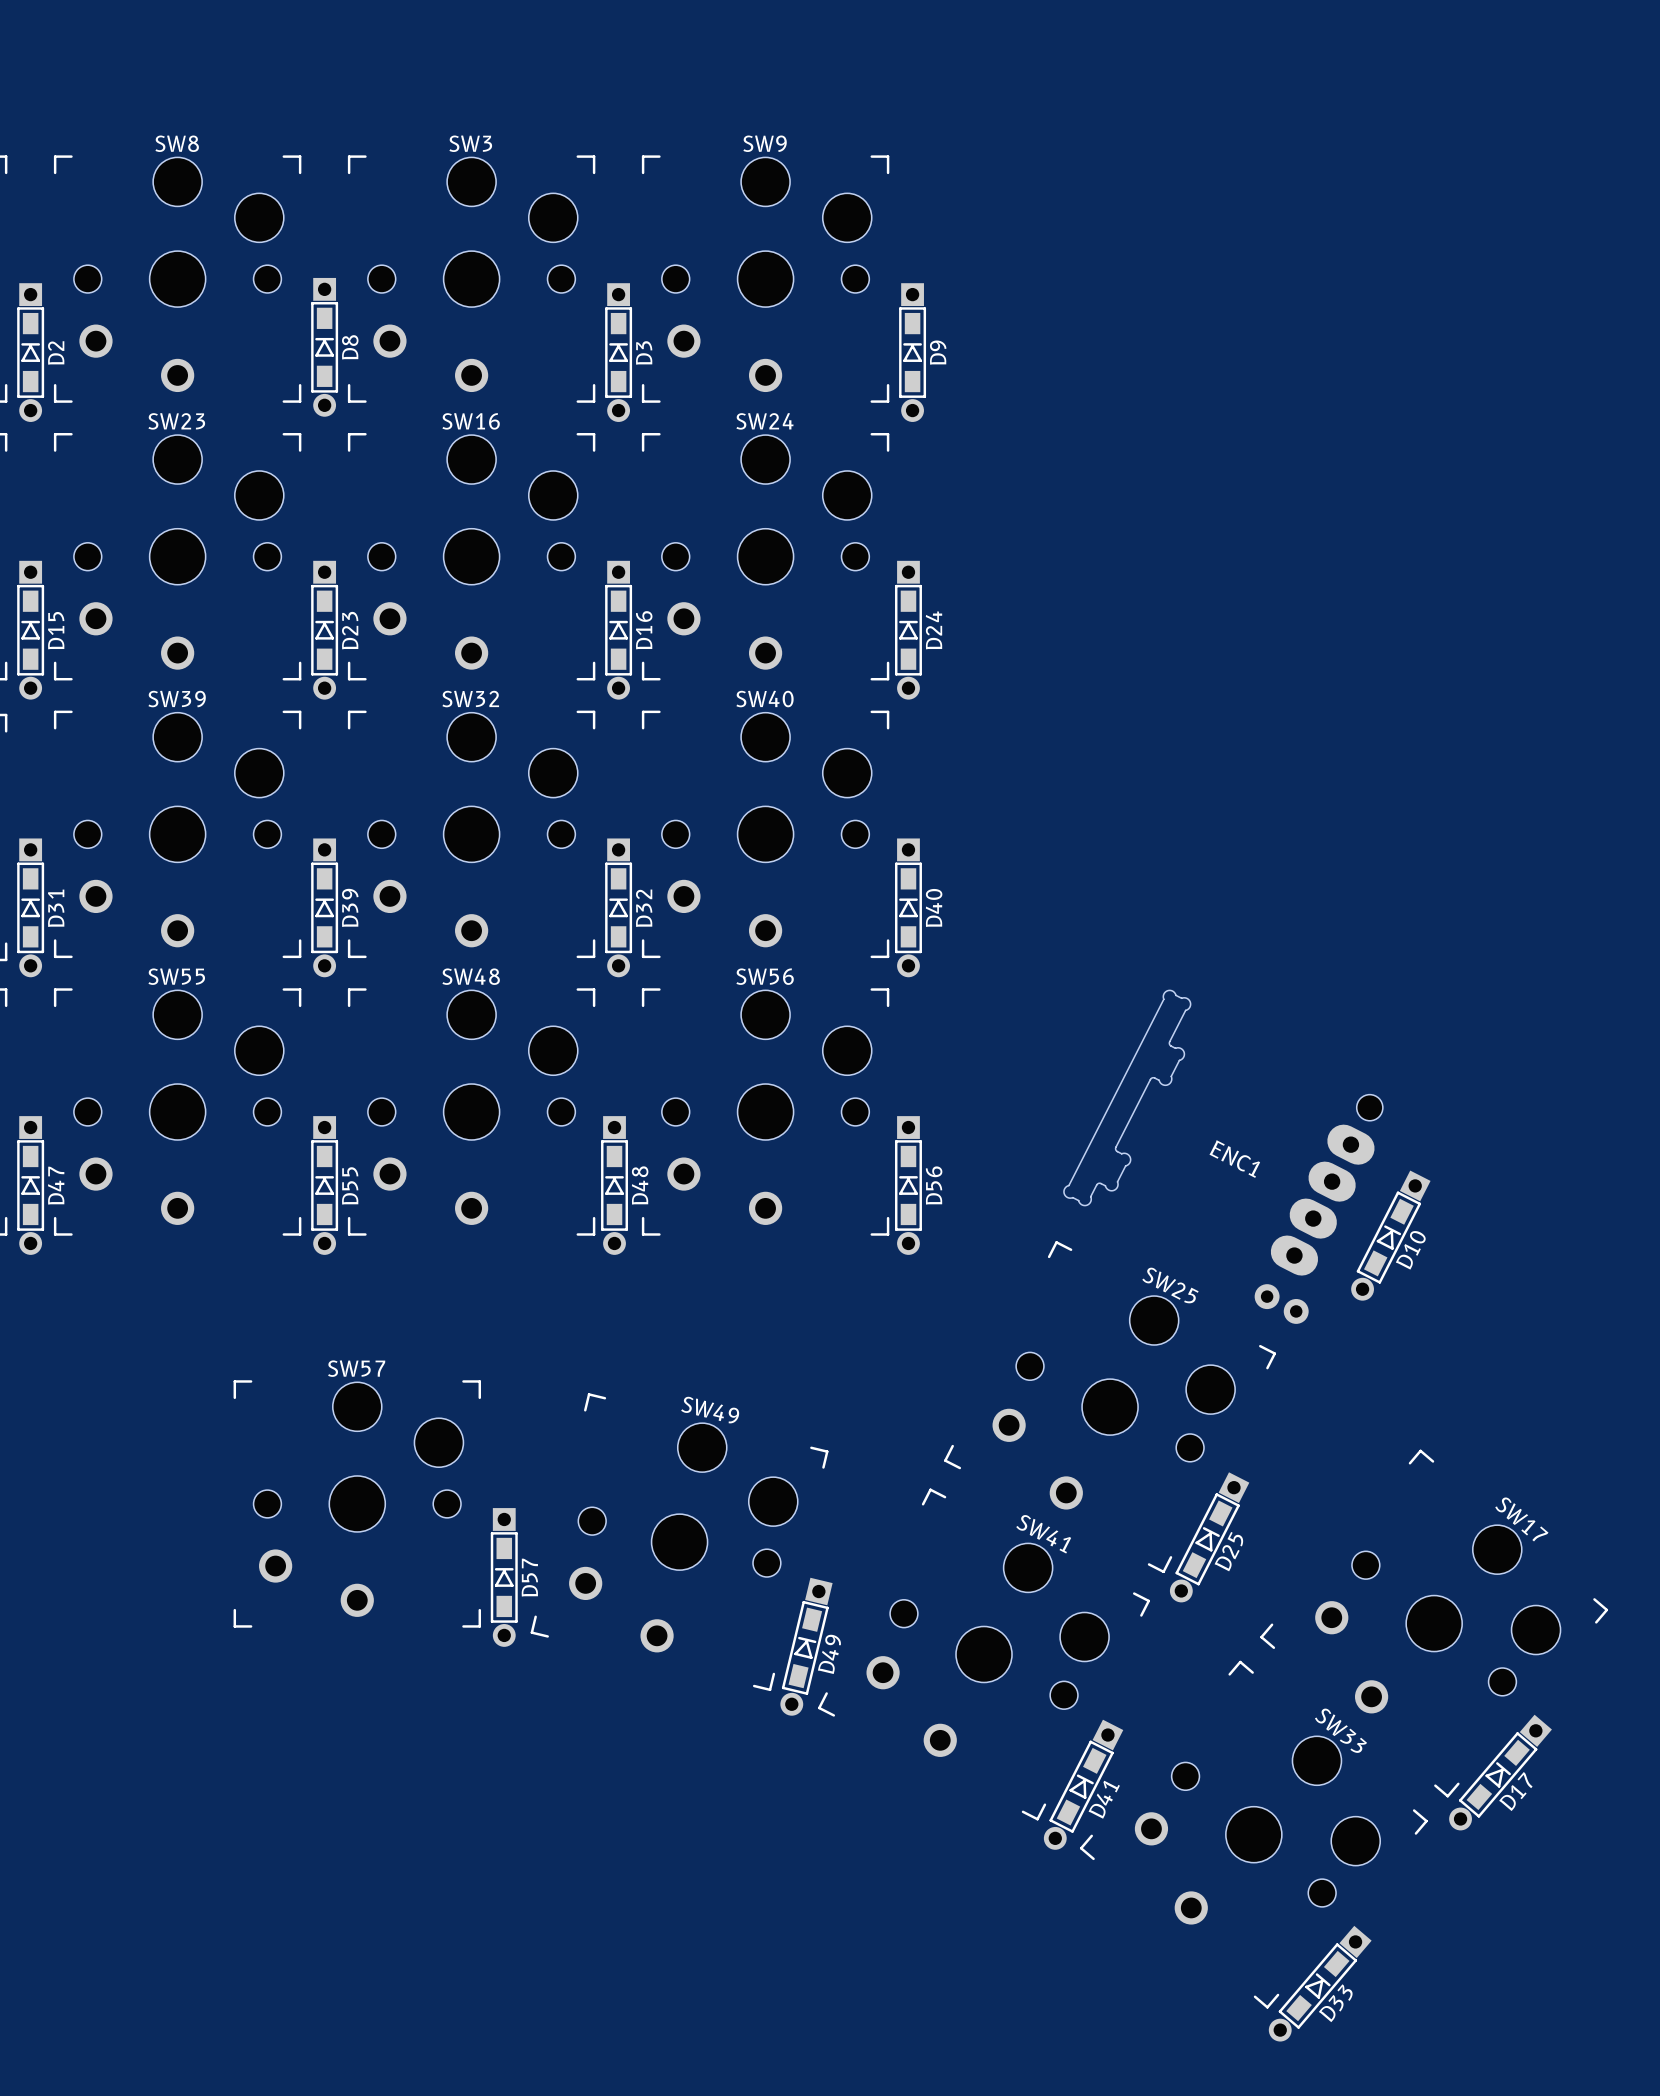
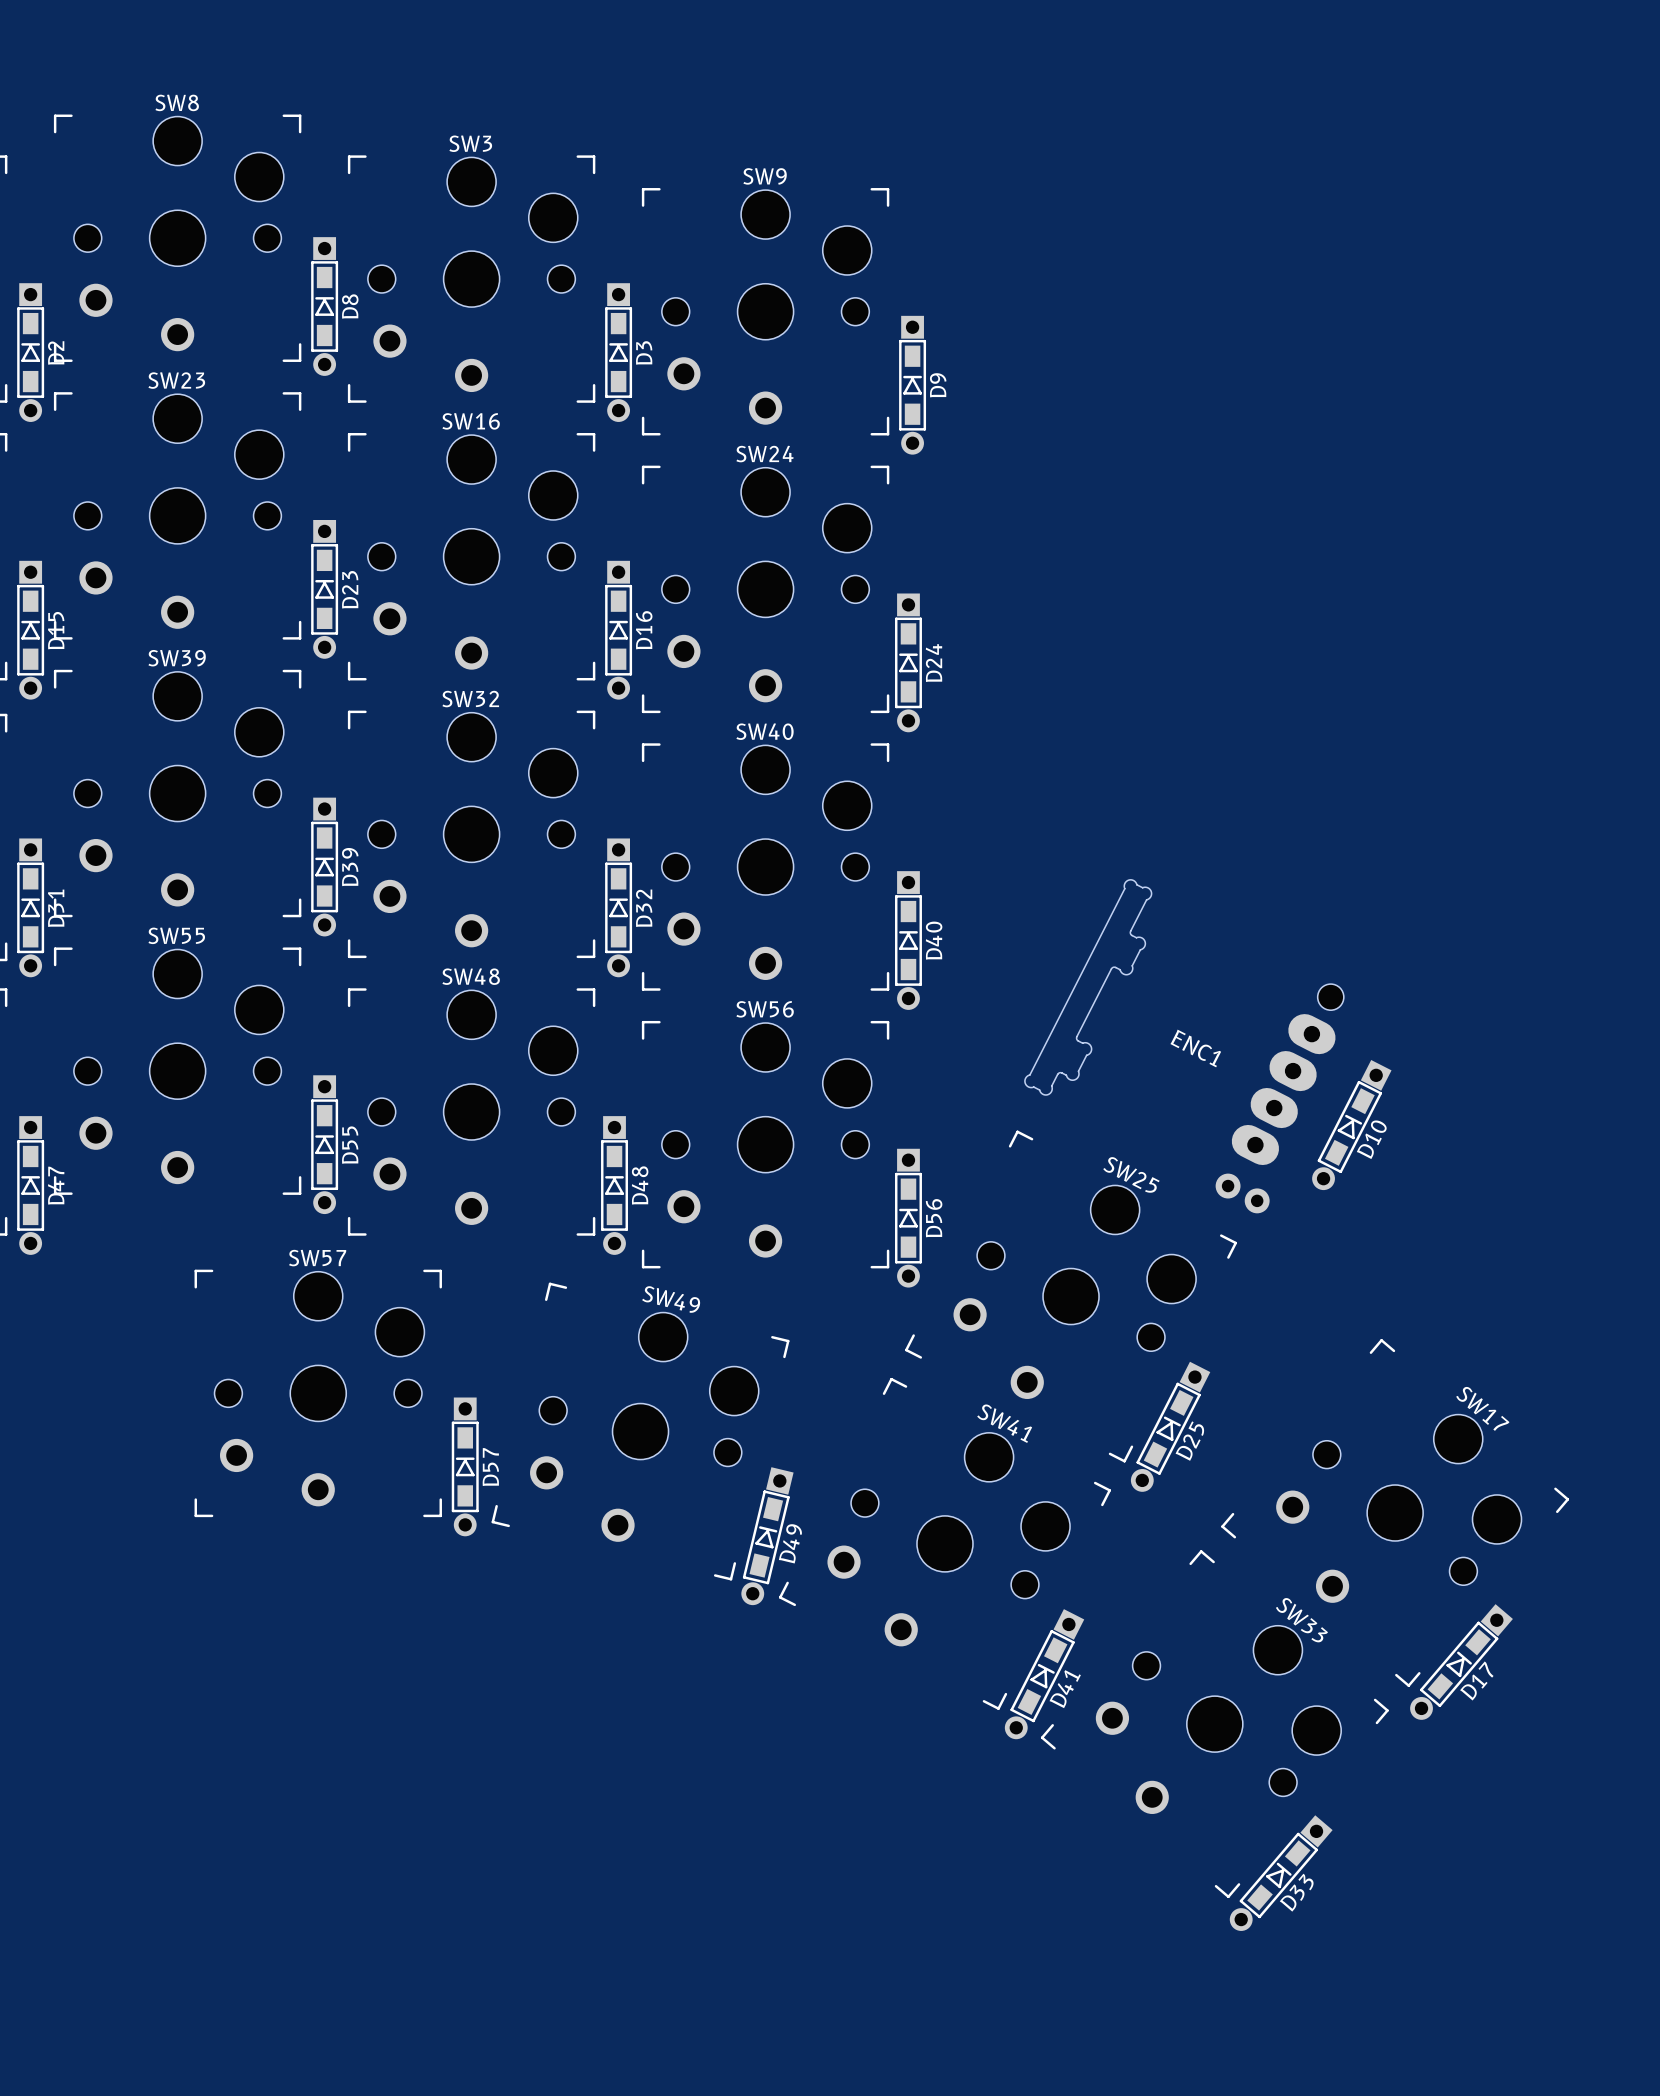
SW8 position: (177, 279) -> (177, 238)
SW9 position: (765, 279) -> (765, 311)
D8 position: (324, 347) -> (324, 306)
D9 position: (912, 352) -> (912, 385)
SW23 position: (177, 556) -> (177, 515)
SW24 position: (765, 556) -> (765, 589)
D23 position: (324, 630) -> (324, 589)
D24 position: (908, 630) -> (908, 662)
SW39 position: (177, 834) -> (177, 793)
SW40 position: (765, 834) -> (765, 867)
D39 position: (324, 907) -> (324, 867)
D40 position: (908, 907) -> (908, 940)
SW55 position: (177, 1112) -> (177, 1071)
SW56 position: (765, 1112) -> (765, 1144)
ENC1 position: (1223, 1156) -> (1184, 1046)
D55 position: (324, 1185) -> (324, 1144)
D56 position: (908, 1185) -> (908, 1218)
D10 position: (1390, 1235) -> (1351, 1125)
SW25 position: (1110, 1407) -> (1071, 1296)
SW57 position: (357, 1503) -> (318, 1393)
D25 position: (1209, 1537) -> (1170, 1426)
SW49 position: (679, 1542) -> (640, 1431)
D57 position: (504, 1577) -> (465, 1466)
SW17 position: (1434, 1623) -> (1395, 1512)
D49 position: (806, 1646) -> (767, 1536)
SW41 position: (984, 1654) -> (944, 1543)
D17 position: (1500, 1772) -> (1461, 1662)
D41 position: (1083, 1784) -> (1044, 1674)
SW33 position: (1253, 1834) -> (1214, 1724)
D33 position: (1320, 1983) -> (1281, 1873)

